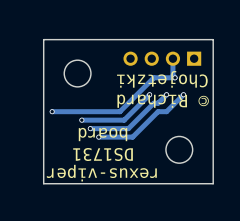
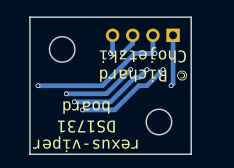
track: none -> (112, 35) (112, 51) (110, 53)
track: none -> (132, 35) (132, 43) (122, 53)
track: none -> (173, 35) (173, 83) (171, 85)
via: none -> (110, 53)
via: none -> (122, 53)
via: none -> (171, 85)

